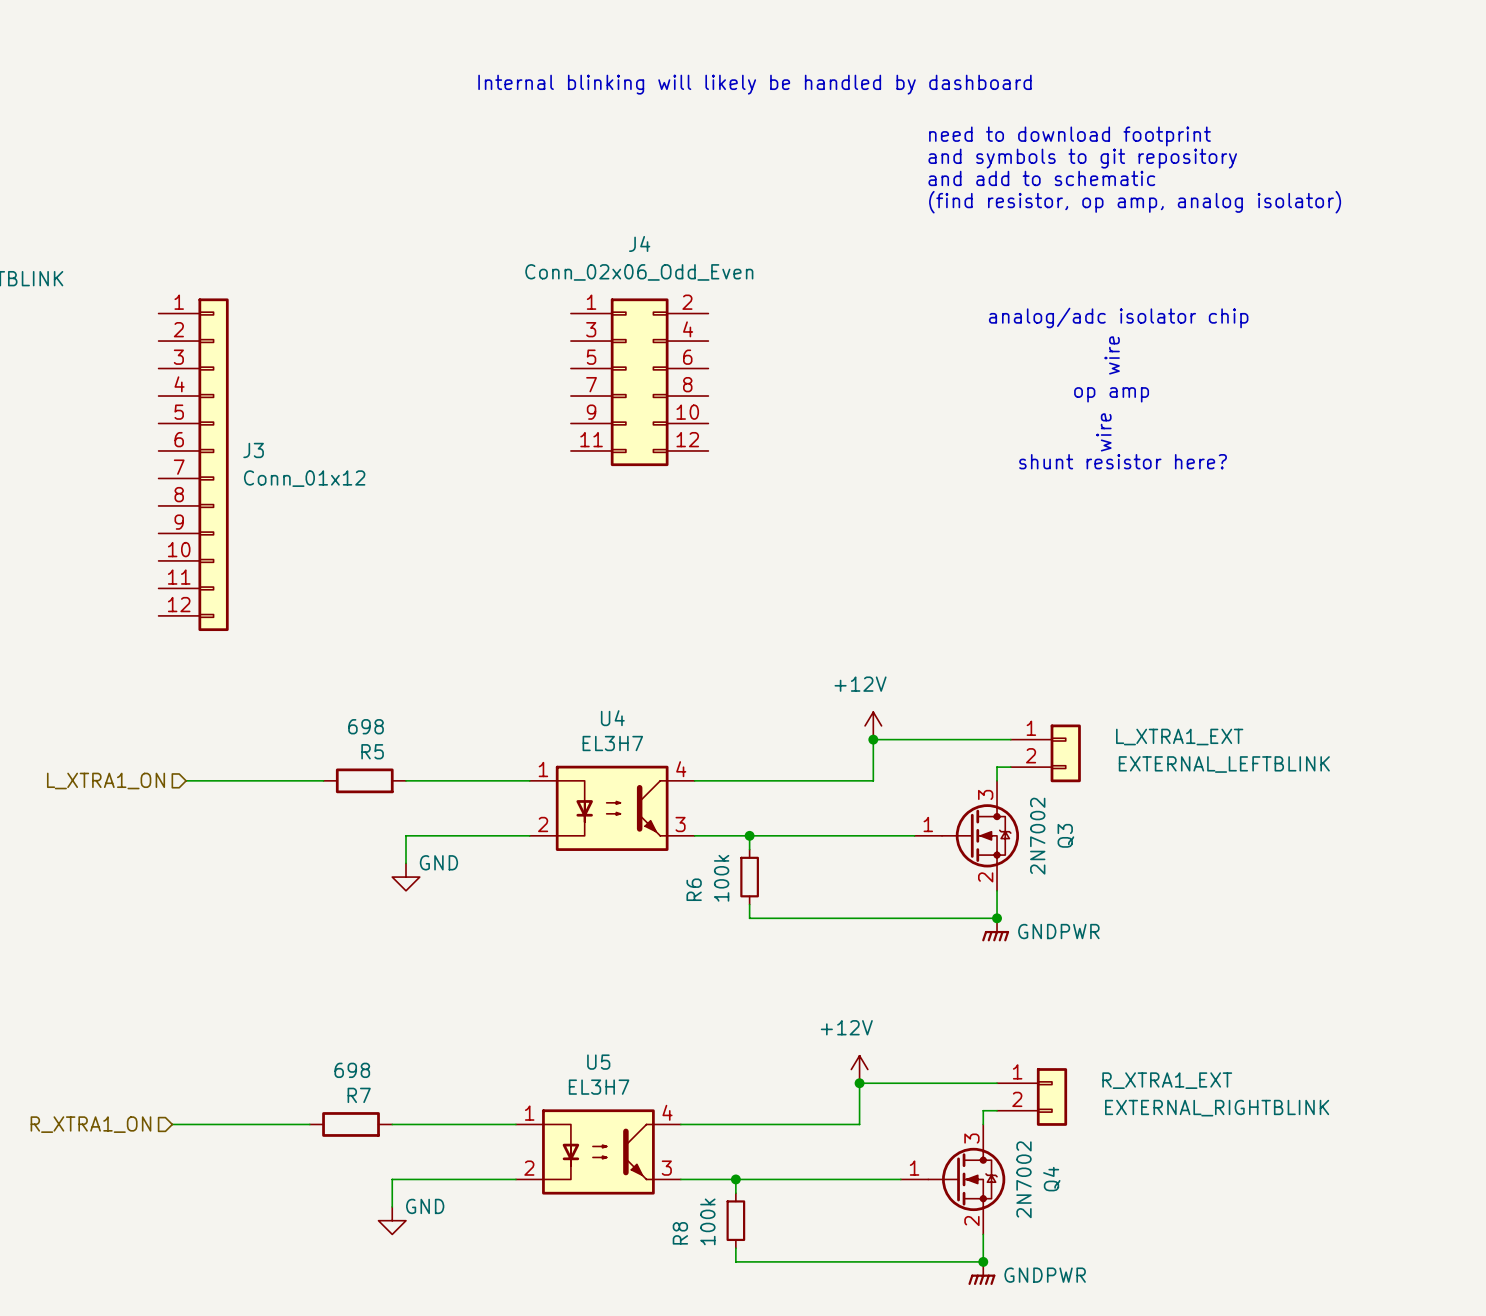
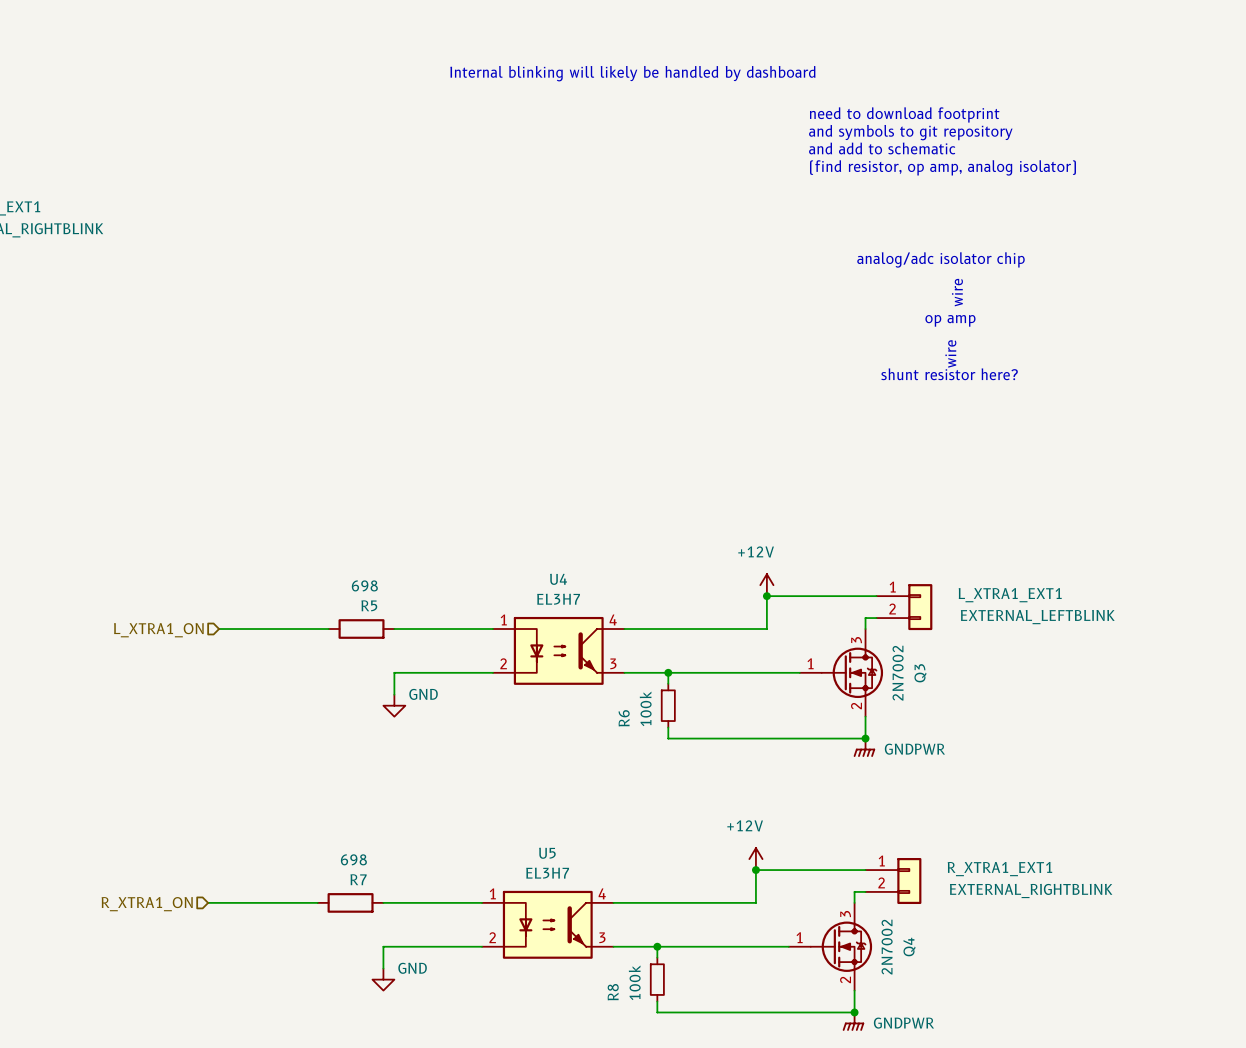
J4: Conn_02x06_Odd_Even (639, 382) -> none
J3: Conn_01x12 (193, 464) -> none
L_XTRA1_EXT name: L_XTRA1_EXT (1179, 737) -> L_XTRA1_EXT1 (1010, 595)
R_XTRA1_EXT name: R_XTRA1_EXT (1167, 1080) -> R_XTRA1_EXT1 (999, 869)

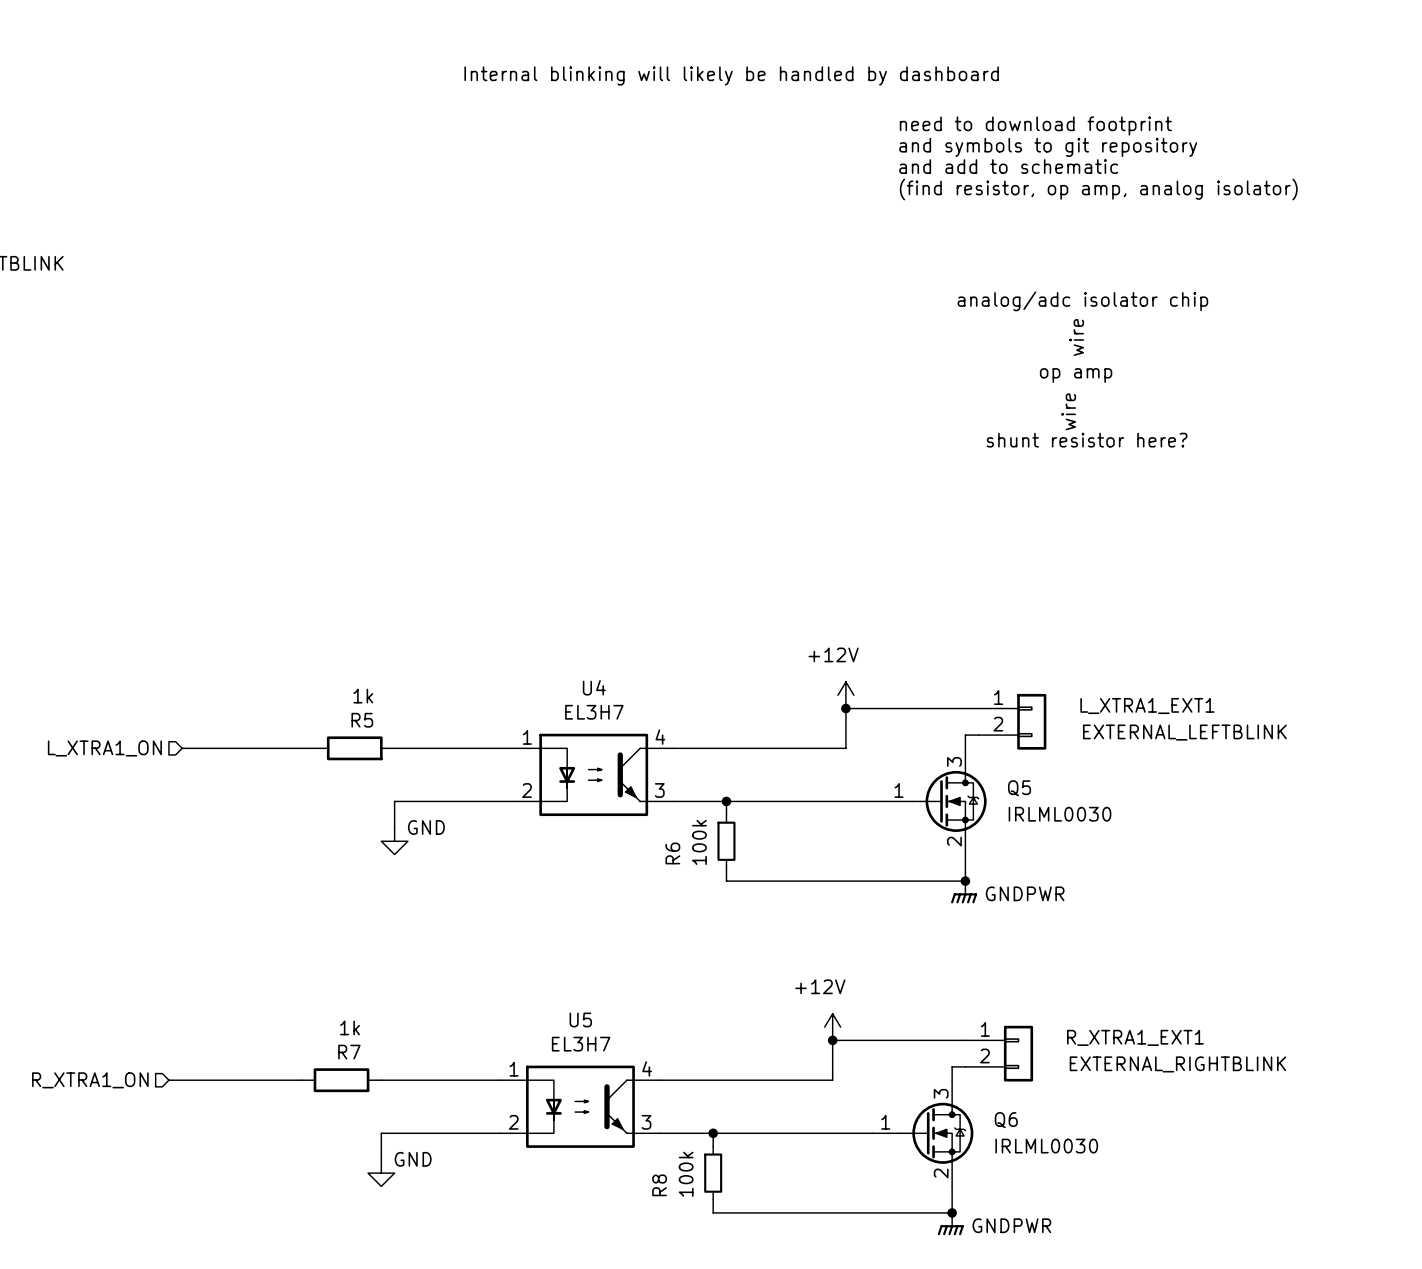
R5 value: 698 (364, 585) -> 1k (363, 696)
Q3 value: 2N7002 (898, 673) -> IRLML0030 (1060, 814)
Q3 name: Q3 (920, 673) -> Q5 (1019, 788)
R7 value: 698 (353, 859) -> 1k (350, 1027)
Q4 value: 2N7002 (887, 947) -> IRLML0030 (1046, 1146)
Q4 name: Q4 (909, 947) -> Q6 (1006, 1120)

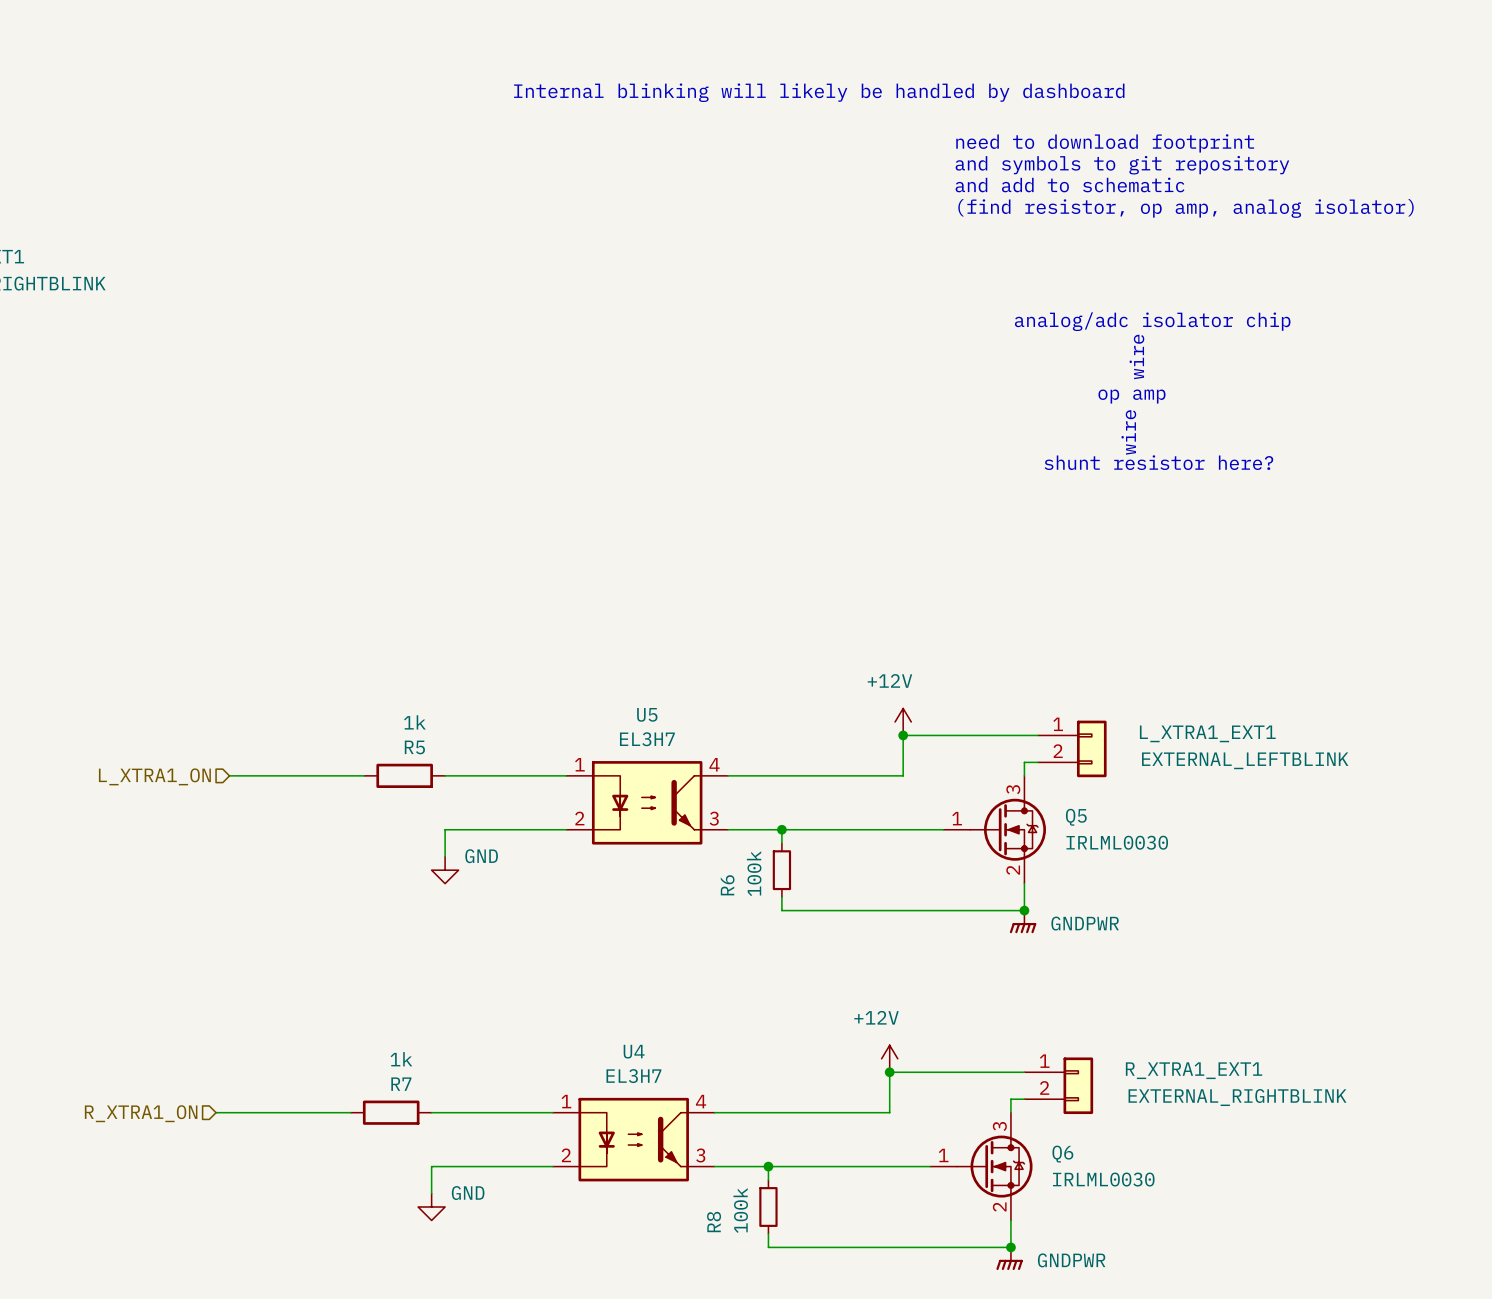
U4 name: U4 (594, 687) -> U5 (647, 714)
U5 name: U5 (580, 1019) -> U4 (634, 1051)

